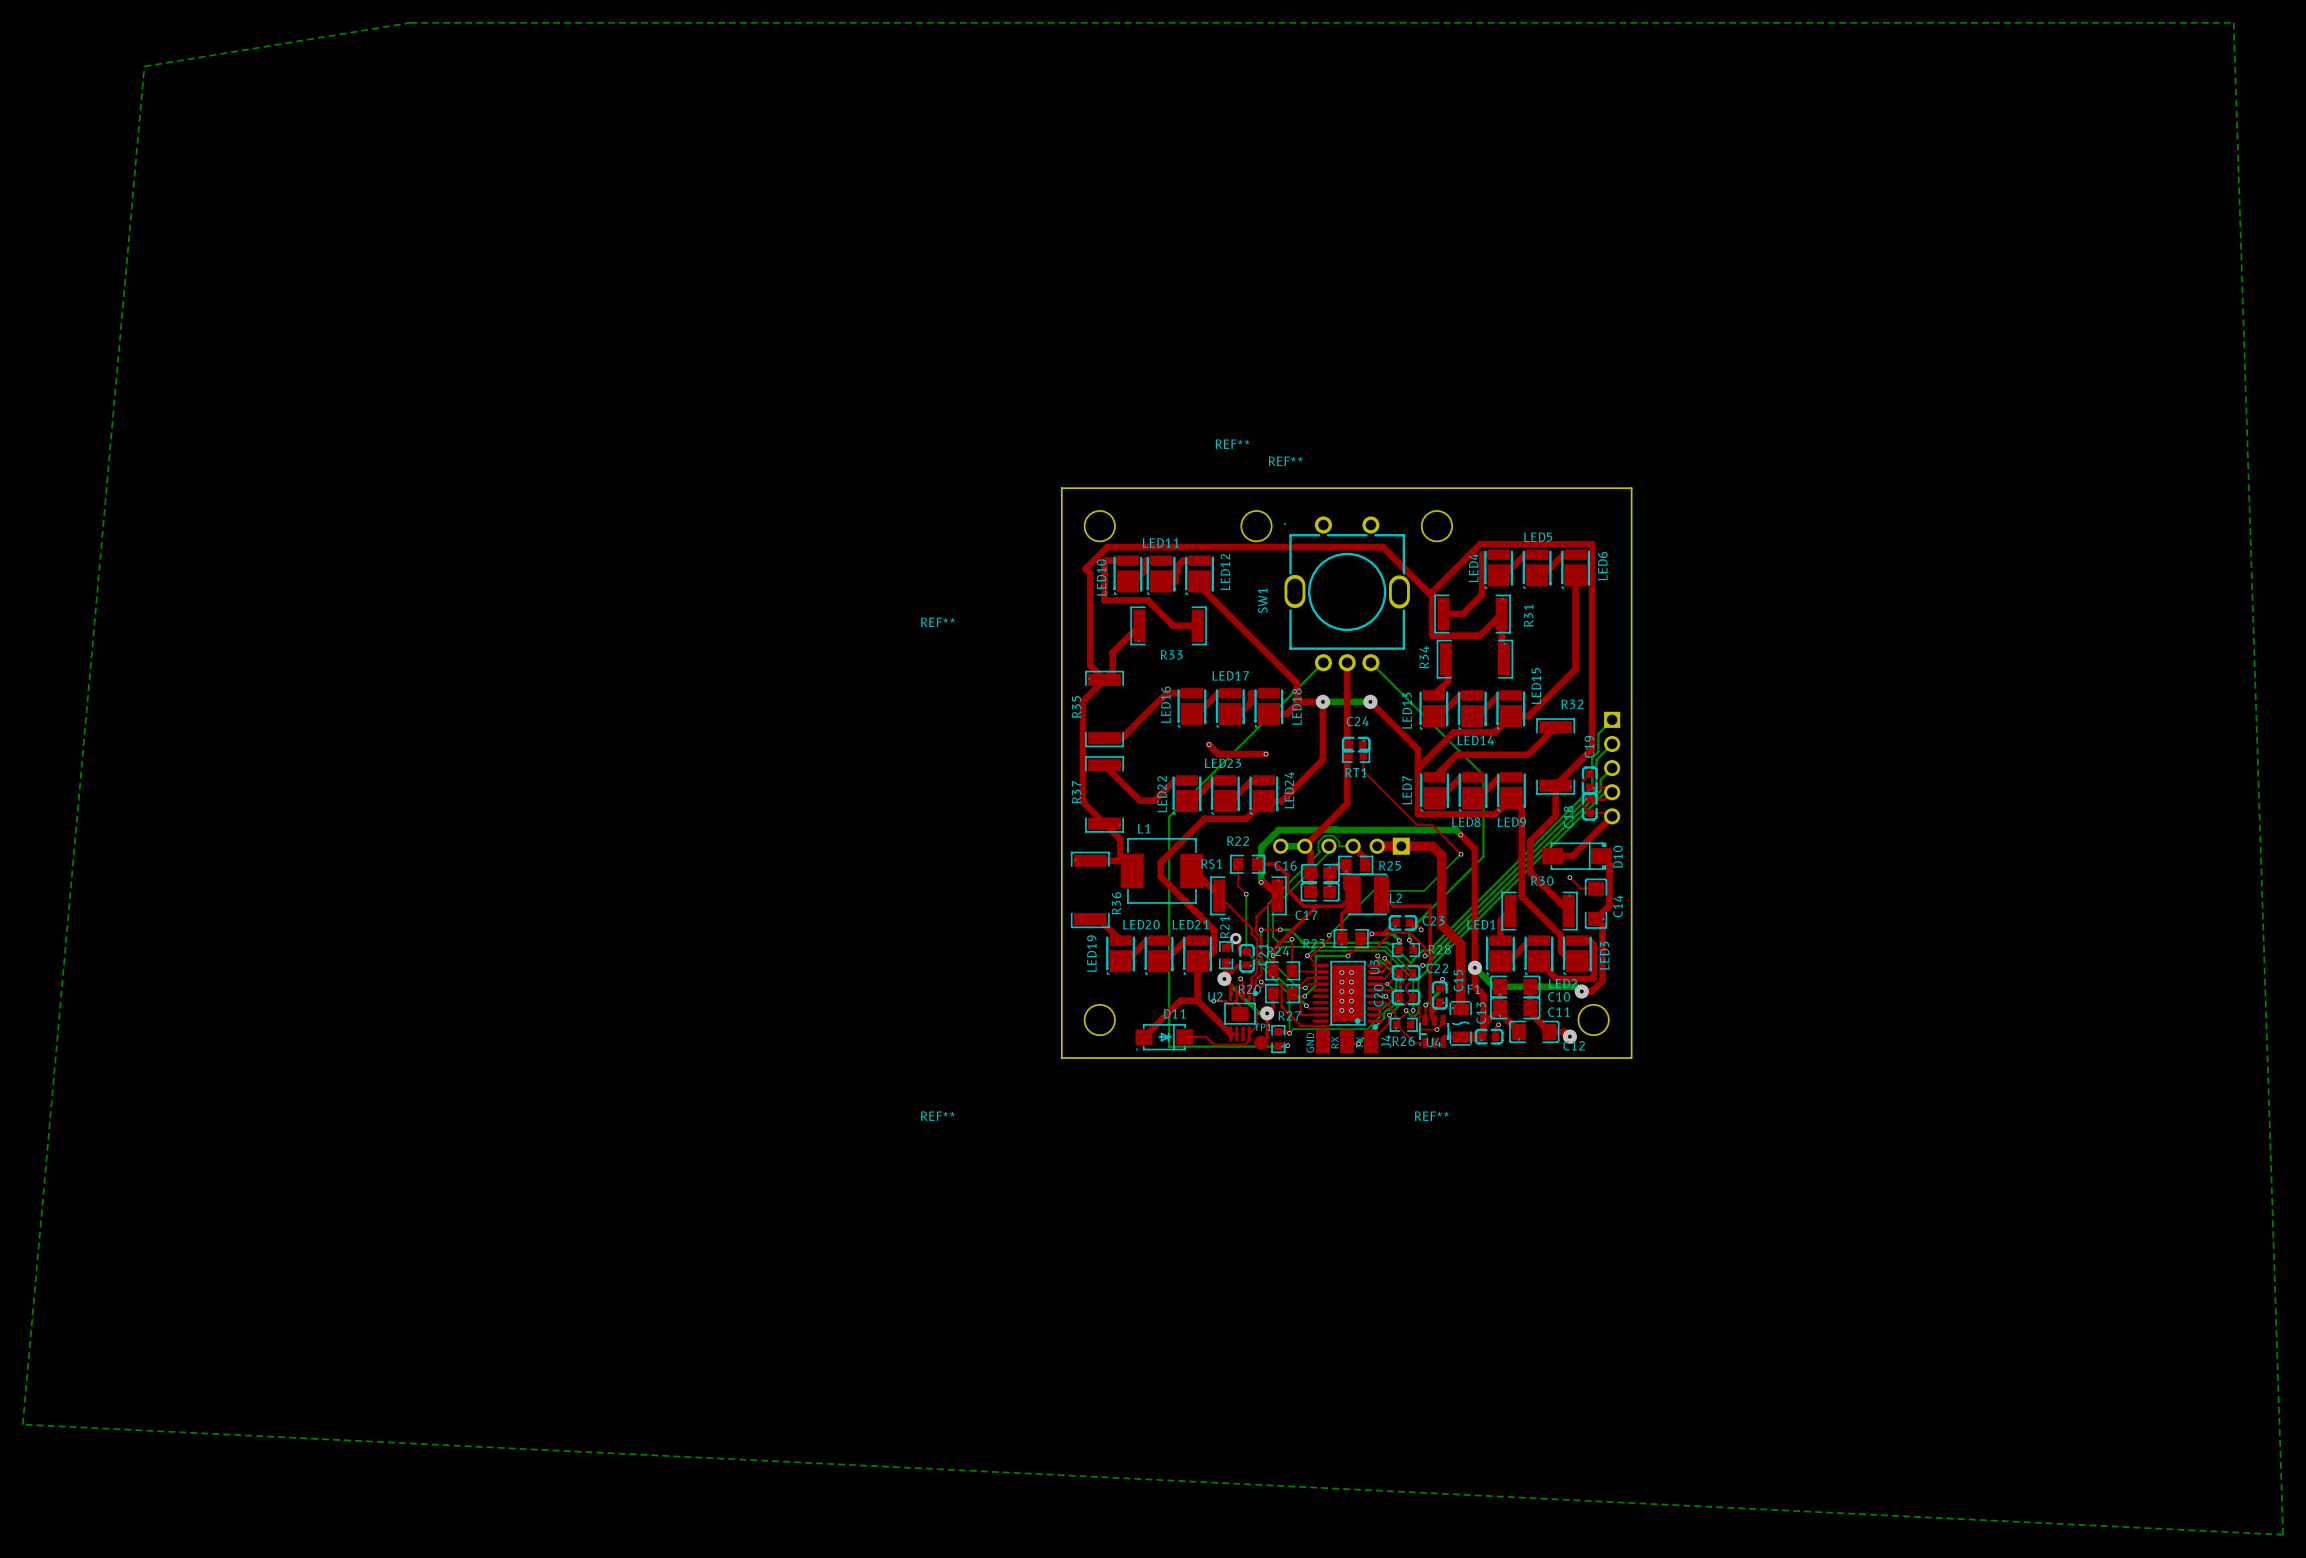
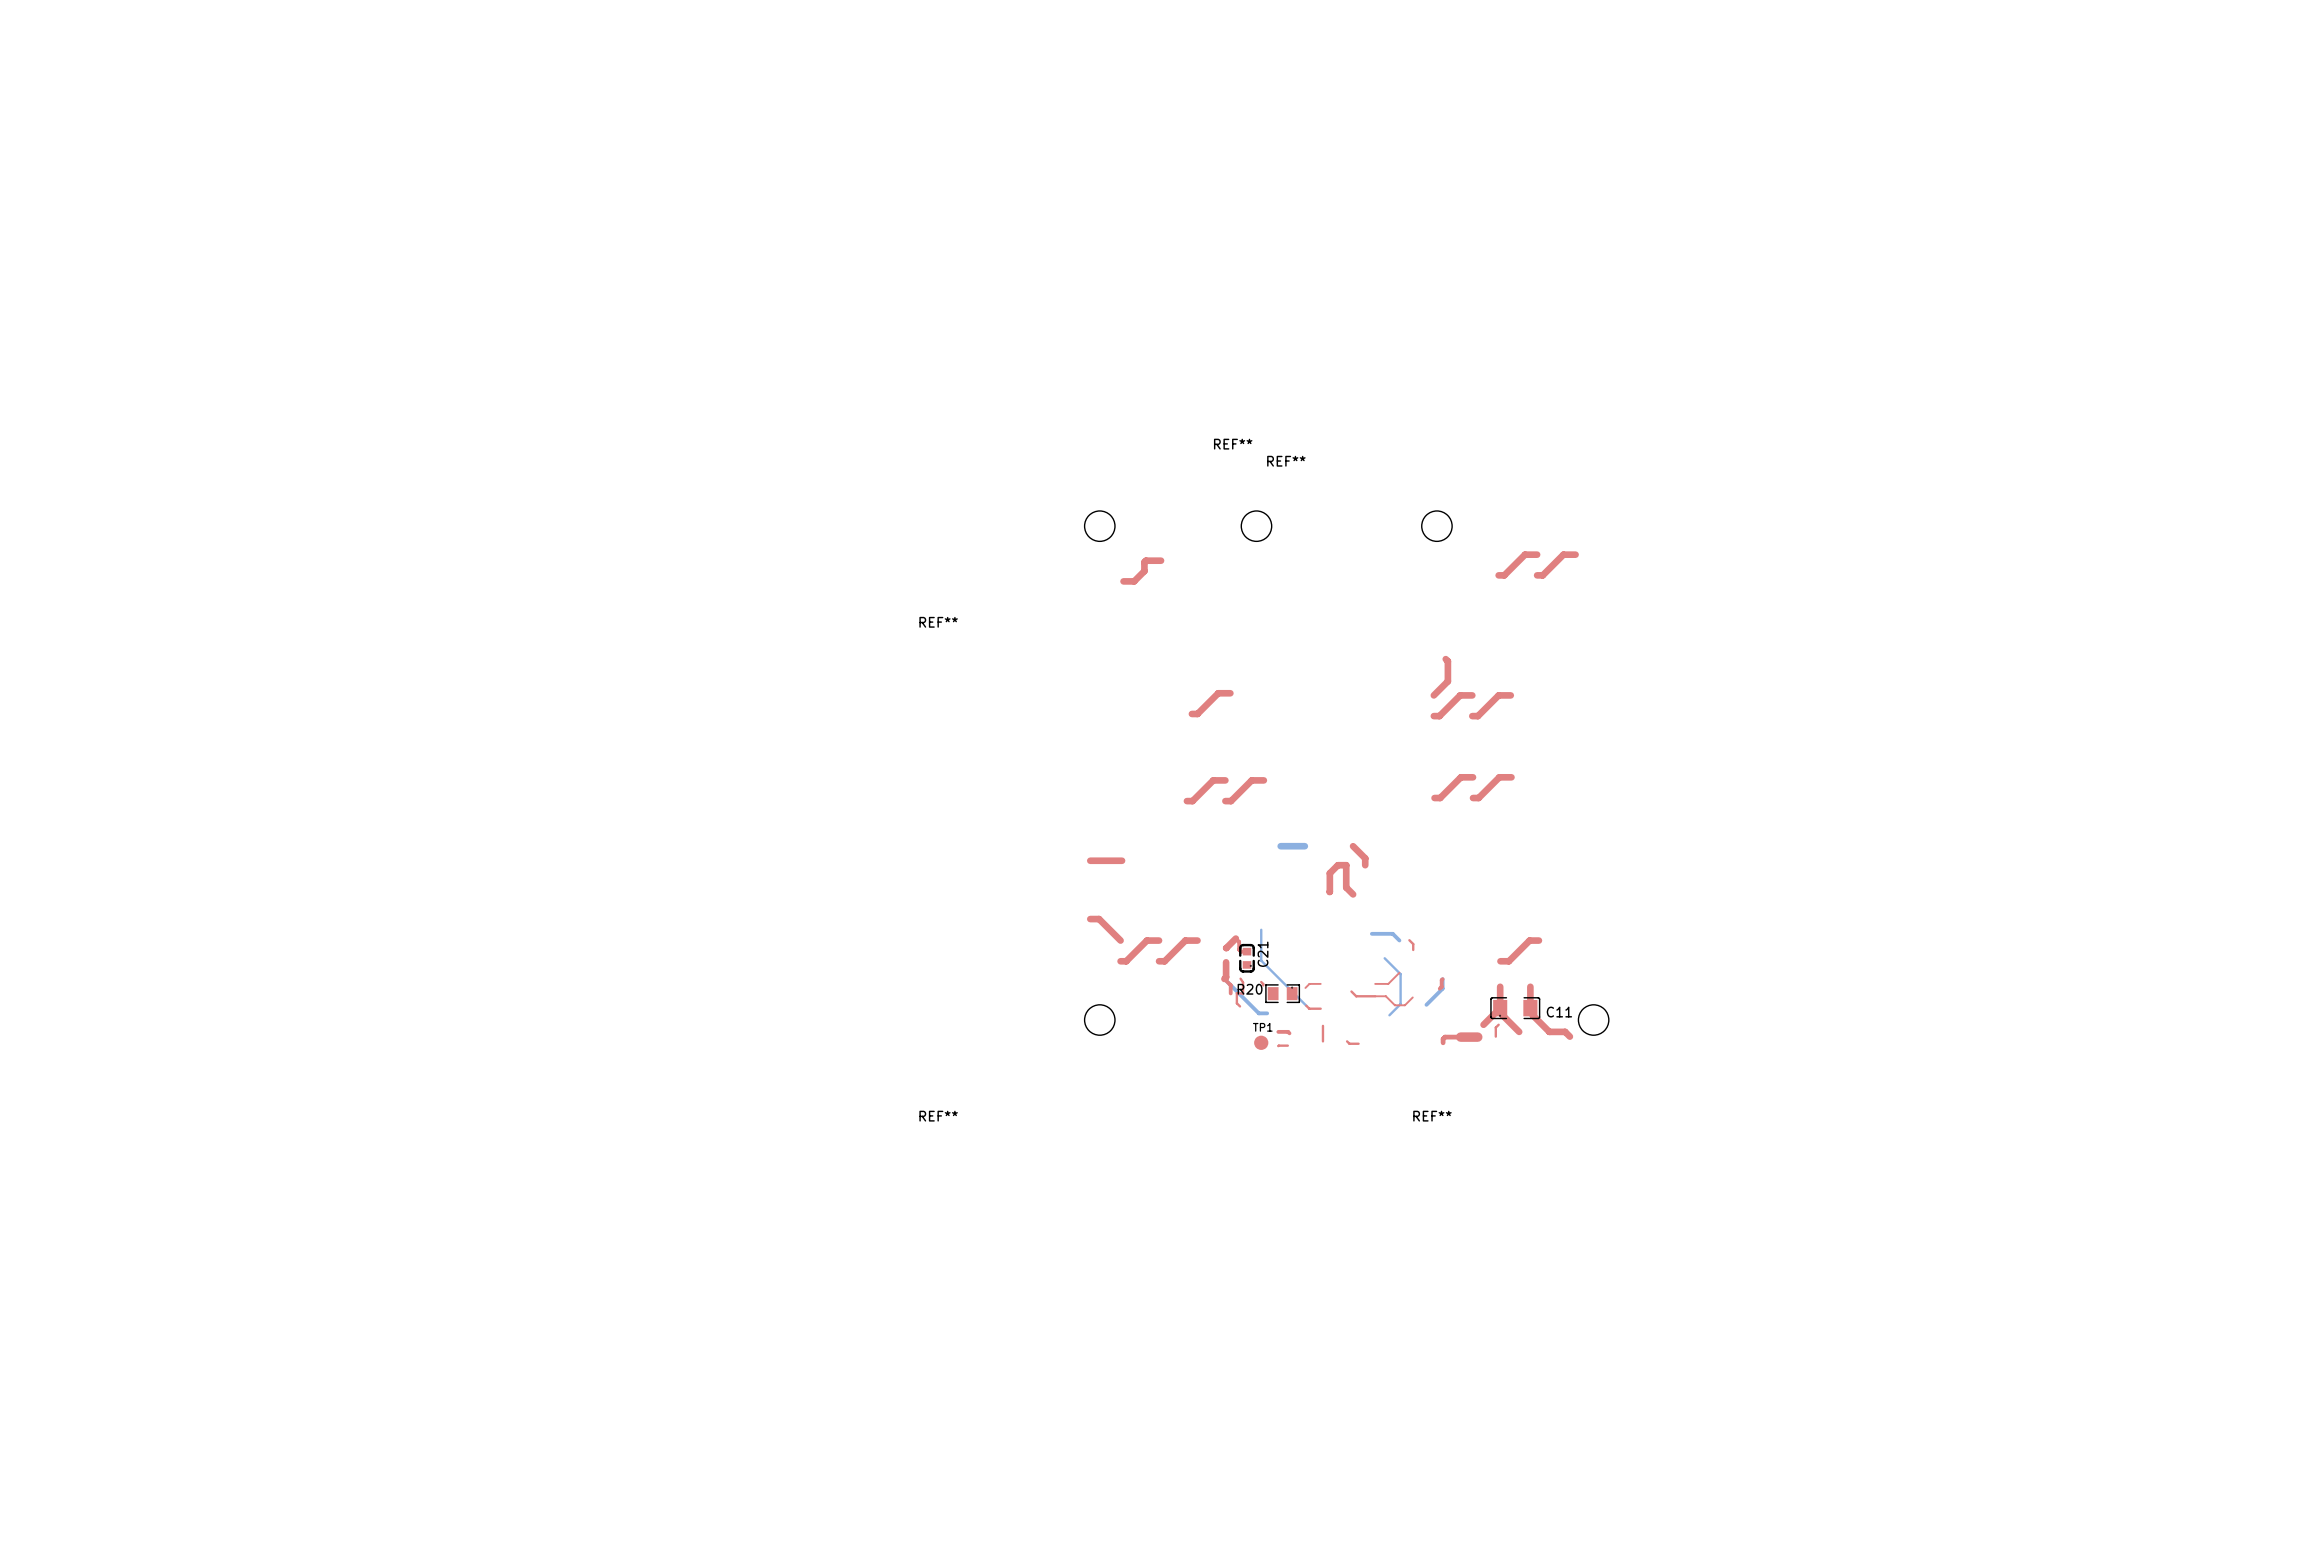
bottom zone outline: (410, 22) (2233, 22) (2283, 1534) (22, 1424) (144, 66) (410, 22) -> none
board edge: (1061, 488) (1631, 488) (1631, 1058) (1061, 1058) (1061, 488) -> none
top track: (1498, 554) (1482, 554) (1482, 594) (1462, 614) (1443, 614) -> none
top track: (1123, 560) (1104, 562) (1104, 600) -> none
top track: (1195, 560) (1183, 560) (1177, 566) (1175, 581) (1156, 581) -> none
LED4: (1498, 569) -> none
LED5: (1537, 569) -> none
LED6: (1575, 569) -> none
LED10: (1127, 575) -> none
LED11: (1161, 575) -> none
LED12: (1199, 575) -> none
top track: (1575, 575) (1575, 669) (1528, 716) (1510, 716) (1494, 732) (1453, 732) (1418, 768) -> none
top track: (1195, 581) (1297, 683) (1297, 703) (1286, 713) (1268, 713) -> none
SW1: (1347, 593) -> none
top track: (1432, 596) (1382, 547) (1107, 547) (1085, 568) (1090, 573) (1090, 665) (1104, 679) -> none
top track: (1104, 600) (1147, 600) (1173, 625) (1197, 625) -> none
R31: (1472, 614) -> none
top track: (1139, 625) (1112, 652) (1112, 671) (1082, 701) (1082, 801) (1120, 839) (1120, 858) (1132, 870) -> none
R33: (1168, 625) -> none
R34: (1474, 659) -> none
top track: (1504, 659) (1501, 652) (1501, 614) (1480, 635) (1432, 635) (1432, 592) (1480, 544) (1592, 544) (1592, 749) (1555, 785) (1555, 815) (1530, 841) (1530, 872) (1568, 911) -> none
bottom track: (1323, 662) (1169, 817) (1169, 1046) (1287, 1045) -> none
top track: (1347, 662) (1347, 803) (1304, 846) (1310, 852) (1310, 894) -> none
bottom track: (1370, 662) (1483, 775) (1483, 856) (1409, 930) (1409, 940) -> none
top track: (1191, 693) (1166, 693) (1121, 738) (1104, 738) -> none
top track: (1268, 693) (1250, 693) (1250, 702) (1239, 713) (1230, 713) -> none
top track: (1297, 701) (1322, 701) (1322, 759) (1281, 801) (1263, 801) (1246, 818) (1204, 818) (1160, 862) (1160, 876) (1214, 930) (1214, 951) (1203, 961) (1197, 961) (1197, 1000) -> none
bottom track: (1322, 701) (1370, 701) -> none
via: (1322, 701) -> none
top track: (1370, 701) (1418, 749) (1418, 814) (1495, 814) (1511, 798) (1521, 808) (1521, 896) (1560, 935) (1560, 951) (1571, 961) (1577, 961) -> none
via: (1370, 701) -> none
LED16: (1191, 707) -> none
LED17: (1230, 707) -> none
LED18: (1268, 707) -> none
R35: (1104, 708) -> none
LED13: (1433, 709) -> none
LED14: (1472, 709) -> none
LED15: (1510, 709) -> none
bottom track: (1612, 719) (1598, 733) (1598, 751) (1592, 757) (1592, 787) (1429, 950) (1422, 950) (1410, 963) (1391, 944) (1387, 942) (1301, 942) (1290, 929) (1280, 929) -> none
top track: (1555, 727) (1528, 754) (1457, 754) (1434, 777) -> none
bottom track: (1612, 743) (1596, 759) (1596, 789) (1429, 955) (1425, 955) -> none
top track: (1209, 744) (1218, 754) (1265, 754) -> none
via: (1209, 744) -> none
C24: (1356, 744) -> none
top track: (1362, 744) (1363, 770) (1415, 825) (1431, 825) (1461, 854) -> none
via: (1265, 754) -> none
RT1: (1356, 755) -> none
R32: (1555, 756) -> none
top track: (1104, 765) (1139, 800) (1154, 800) (1174, 780) (1186, 780) -> none
bottom track: (1612, 768) (1600, 779) (1600, 790) (1426, 965) (1422, 965) -> none
part: (1612, 768) -> none
top track: (1589, 774) (1582, 781) (1582, 805) (1589, 812) (1608, 812) (1612, 816) (1572, 856) (1552, 856) -> none
C19: (1589, 780) -> none
top track: (1589, 787) (1607, 787) (1612, 792) (1604, 799) (1589, 799) -> none
LED7: (1434, 791) -> none
LED8: (1473, 791) -> none
LED9: (1511, 791) -> none
bottom track: (1612, 792) (1605, 792) (1418, 979) -> none
R37: (1104, 794) -> none
LED22: (1186, 794) -> none
LED23: (1225, 794) -> none
LED24: (1263, 794) -> none
C18: (1589, 806) -> none
top track: (1460, 834) (1474, 849) (1474, 986) (1483, 995) (1483, 1031) (1477, 1037) (1477, 1035) (1483, 1029) -> none
bottom track: (1460, 834) (1455, 830) (1278, 830) (1261, 847) (1261, 882) -> none
via: (1460, 834) -> none
bottom track: (1328, 846) (1328, 852) (1273, 908) (1273, 936) (1277, 941) (1289, 941) (1292, 939) -> none
part: (1341, 846) -> none
bottom track: (1353, 846) (1339, 846) (1339, 841) (1333, 835) (1324, 835) (1318, 841) (1319, 852) (1267, 904) (1267, 957) (1298, 987) (1305, 987) -> none
top track: (1377, 846) (1432, 846) (1441, 855) (1441, 925) (1460, 944) (1460, 1009) -> none
bottom track: (1461, 854) (1424, 890) (1373, 890) (1329, 935) -> none
via: (1461, 854) -> none
D10: (1577, 856) -> none
top track: (1601, 856) (1609, 864) (1609, 905) (1596, 918) (1602, 925) (1602, 981) (1592, 991) (1581, 991) -> none
top track: (1238, 864) (1238, 886) (1246, 894) -> none
R22: (1247, 864) -> none
top track: (1257, 864) (1276, 864) (1287, 875) (1287, 889) (1304, 906) (1341, 906) (1353, 894) (1353, 903) (1341, 914) (1341, 938) -> none
R25: (1355, 865) -> none
L1: (1161, 870) -> none
top track: (1191, 870) (1194, 870) (1251, 928) (1251, 933) (1256, 939) (1256, 972) (1251, 977) (1249, 993) -> none
C16: (1320, 873) -> none
top track: (1569, 877) (1580, 888) (1596, 888) -> none
via: (1569, 877) -> none
top track: (1261, 882) (1264, 882) (1277, 895) (1256, 916) (1255, 932) (1261, 937) (1261, 974) (1255, 979) (1256, 986) (1254, 988) (1256, 1026) (1249, 1033) (1249, 1040) (1245, 1044) (1214, 1044) (1206, 1037) (1184, 1037) -> none
via: (1261, 882) -> none
R36: (1090, 889) -> none
C17: (1320, 892) -> none
bottom track: (1246, 894) (1246, 951) (1289, 994) (1289, 1033) (1293, 1029) (1367, 1029) (1379, 1016) (1379, 1011) (1392, 1000) (1392, 988) (1387, 983) -> none
via: (1246, 894) -> none
L2: (1367, 894) -> none
top track: (1381, 894) (1393, 906) (1430, 906) (1430, 1001) (1431, 1015) (1434, 1018) (1434, 1020) (1432, 1018) (1432, 1012) (1439, 1004) (1439, 1001) -> none
RS1: (1248, 895) -> none
C14: (1596, 903) -> none
top track: (1316, 906) (1273, 949) (1273, 970) -> none
top track: (1510, 911) (1500, 920) (1500, 940) -> none
R30: (1539, 911) -> none
top track: (1396, 922) (1383, 933) (1371, 933) (1367, 938) (1360, 938) -> none
C23: (1402, 922) -> none
top track: (1409, 922) (1414, 922) (1421, 929) -> none
top track: (1261, 929) (1280, 929) -> none
via: (1261, 929) -> none
via: (1280, 929) -> none
via: (1421, 929) -> none
via: (1371, 933) -> none
top track: (1329, 935) (1329, 938) (1312, 955) (1307, 955) (1317, 965) (1320, 965) -> none
via: (1329, 935) -> none
via: (1235, 938) -> none
R23: (1351, 938) -> none
top track: (1292, 939) (1292, 970) (1320, 971) -> none
via: (1292, 939) -> none
top track: (1399, 940) (1399, 949) (1390, 958) (1390, 972) (1385, 977) (1375, 977) -> none
via: (1399, 940) -> none
via: (1409, 940) -> none
top track: (1577, 940) (1589, 940) (1593, 944) (1592, 978) (1556, 978) (1538, 961) -> none
R28: (1406, 949) -> none
LED19: (1120, 955) -> none
LED20: (1159, 955) -> none
LED21: (1197, 955) -> none
R21: (1226, 955) -> none
bottom track: (1273, 955) (1281, 946) (1386, 946) (1418, 979) -> none
via: (1273, 955) -> none
bottom track: (1307, 955) (1312, 950) (1384, 950) (1413, 979) (1413, 1010) -> none
via: (1307, 955) -> none
top track: (1348, 955) (1355, 948) (1375, 948) (1391, 932) (1409, 932) (1425, 947) (1425, 955) -> none
bottom track: (1348, 955) (1315, 955) (1315, 985) (1304, 996) -> none
via: (1348, 955) -> none
top track: (1377, 955) (1377, 963) (1375, 965) -> none
bottom track: (1377, 955) (1379, 960) (1396, 975) (1396, 1002) (1383, 1013) (1384, 1017) (1358, 1043) -> none
via: (1377, 955) -> none
via: (1425, 955) -> none
LED1: (1500, 955) -> none
LED2: (1538, 955) -> none
LED3: (1577, 955) -> none
top track: (1384, 958) (1386, 967) (1382, 971) (1375, 971) -> none
via: (1384, 958) -> none
top track: (1246, 964) (1237, 966) (1224, 978) -> none
drawing: [1331, 964, 1365, 1022] -> none
top track: (1422, 965) (1406, 965) (1406, 978) (1399, 985) (1399, 997) (1393, 990) (1375, 990) -> none
via: (1422, 965) -> none
bottom track: (1474, 967) (1493, 986) (1577, 986) (1581, 991) -> none
via: (1474, 967) -> none
R24: (1282, 970) -> none
via: (1341, 972) -> none
via: (1351, 972) -> none
C22: (1406, 972) -> none
top track: (1412, 972) (1412, 979) (1406, 986) (1406, 990) (1419, 1004) (1419, 1028) (1436, 1029) (1443, 1020) -> none
top track: (1320, 977) (1308, 977) (1292, 993) -> none
via: (1224, 978) -> none
via: (1240, 978) -> none
bottom track: (1418, 979) (1418, 1012) (1415, 1015) (1411, 1015) (1406, 1010) -> none
via: (1442, 979) -> none
via: (1261, 982) -> none
via: (1341, 982) -> none
via: (1351, 982) -> none
via: (1387, 983) -> none
C10: (1515, 986) -> none
top track: (1261, 987) (1264, 984) (1281, 984) (1281, 1006) (1300, 1025) (1329, 1025) (1347, 1007) (1347, 993) -> none
via: (1305, 987) -> none
via: (1341, 991) -> none
via: (1351, 991) -> none
via: (1581, 991) -> none
top track: (1273, 993) (1273, 1007) (1267, 1013) (1267, 1036) (1261, 1042) -> none
U3: (1347, 995) -> none
C15: (1439, 995) -> none
top track: (1304, 996) (1300, 997) (1300, 1014) (1320, 1014) -> none
via: (1304, 996) -> none
via: (1385, 996) -> none
C20: (1406, 997) -> none
top track: (1197, 1000) (1230, 1033) (1236, 1033) -> none
top track: (1197, 1000) (1180, 1000) (1143, 1037) -> none
top track: (1213, 1001) (1225, 1001) (1228, 1004) (1232, 1004) (1236, 1001) -> none
via: (1213, 1001) -> none
via: (1341, 1001) -> none
via: (1351, 1001) -> none
top track: (1375, 1002) (1385, 1002) (1395, 1012) (1395, 1016) (1398, 1019) (1396, 1024) -> none
via: (1306, 1005) -> none
top track: (1425, 1005) (1425, 1020) -> none
via: (1425, 1005) -> none
via: (1341, 1010) -> none
via: (1351, 1010) -> none
top track: (1406, 1010) (1396, 1024) -> none
via: (1406, 1010) -> none
top track: (1413, 1010) (1413, 1019) (1410, 1024) -> none
via: (1413, 1010) -> none
U2: (1241, 1013) -> none
via: (1267, 1013) -> none
top track: (1389, 1015) (1389, 1023) (1371, 1041) -> none
via: (1389, 1015) -> none
F1: (1460, 1023) -> none
top track: (1396, 1024) (1414, 1042) (1425, 1042) -> none
R26: (1403, 1024) -> none
via: (1498, 1024) -> none
via: (1436, 1029) -> none
U4: (1434, 1031) -> none
C12: (1534, 1031) -> none
via: (1289, 1033) -> none
C13: (1489, 1036) -> none
via: (1569, 1036) -> none
D11: (1164, 1037) -> none
R27: (1278, 1039) -> none
J4: (1347, 1041) -> none
via: (1358, 1043) -> none
via: (1287, 1045) -> none

